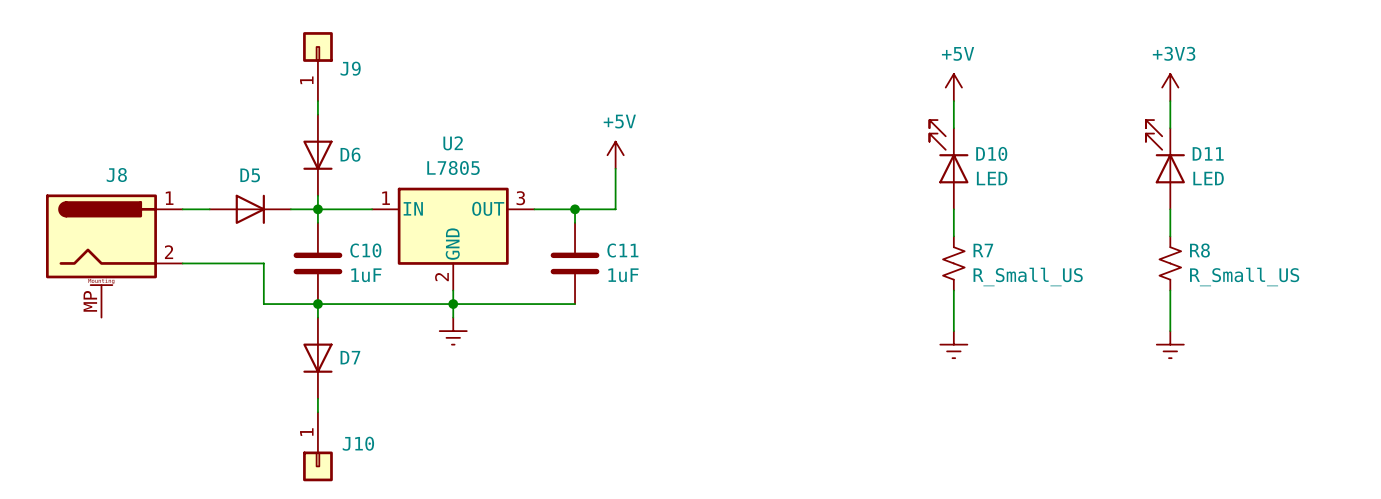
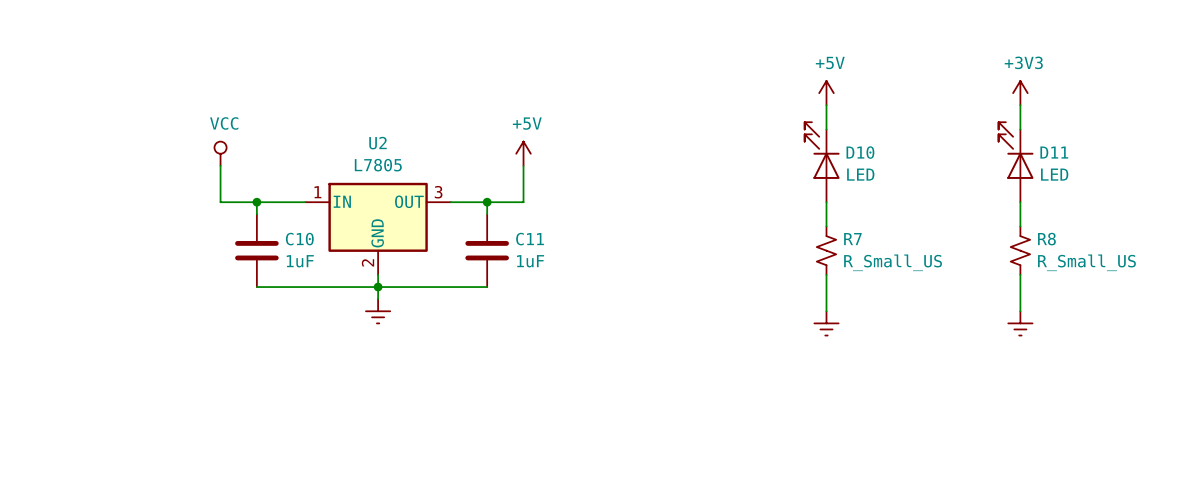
J9: (317, 66) -> none
wire: (317, 101) (317, 114) -> none
power symbol: none -> VCC (220, 153)
D6: (317, 155) -> none
wire: none -> (220, 165) (220, 202) (232, 202)
wire: (317, 195) (317, 209) -> none
wire: (182, 209) (209, 209) -> none
D5: (250, 209) -> none
J8: (114, 256) -> none
wire: (182, 263) (263, 263) (263, 304) (317, 304) (317, 317) -> none
junction: (317, 304) -> none
D7: (317, 358) -> none
wire: (317, 398) (317, 412) -> none
J10: (317, 446) -> none

